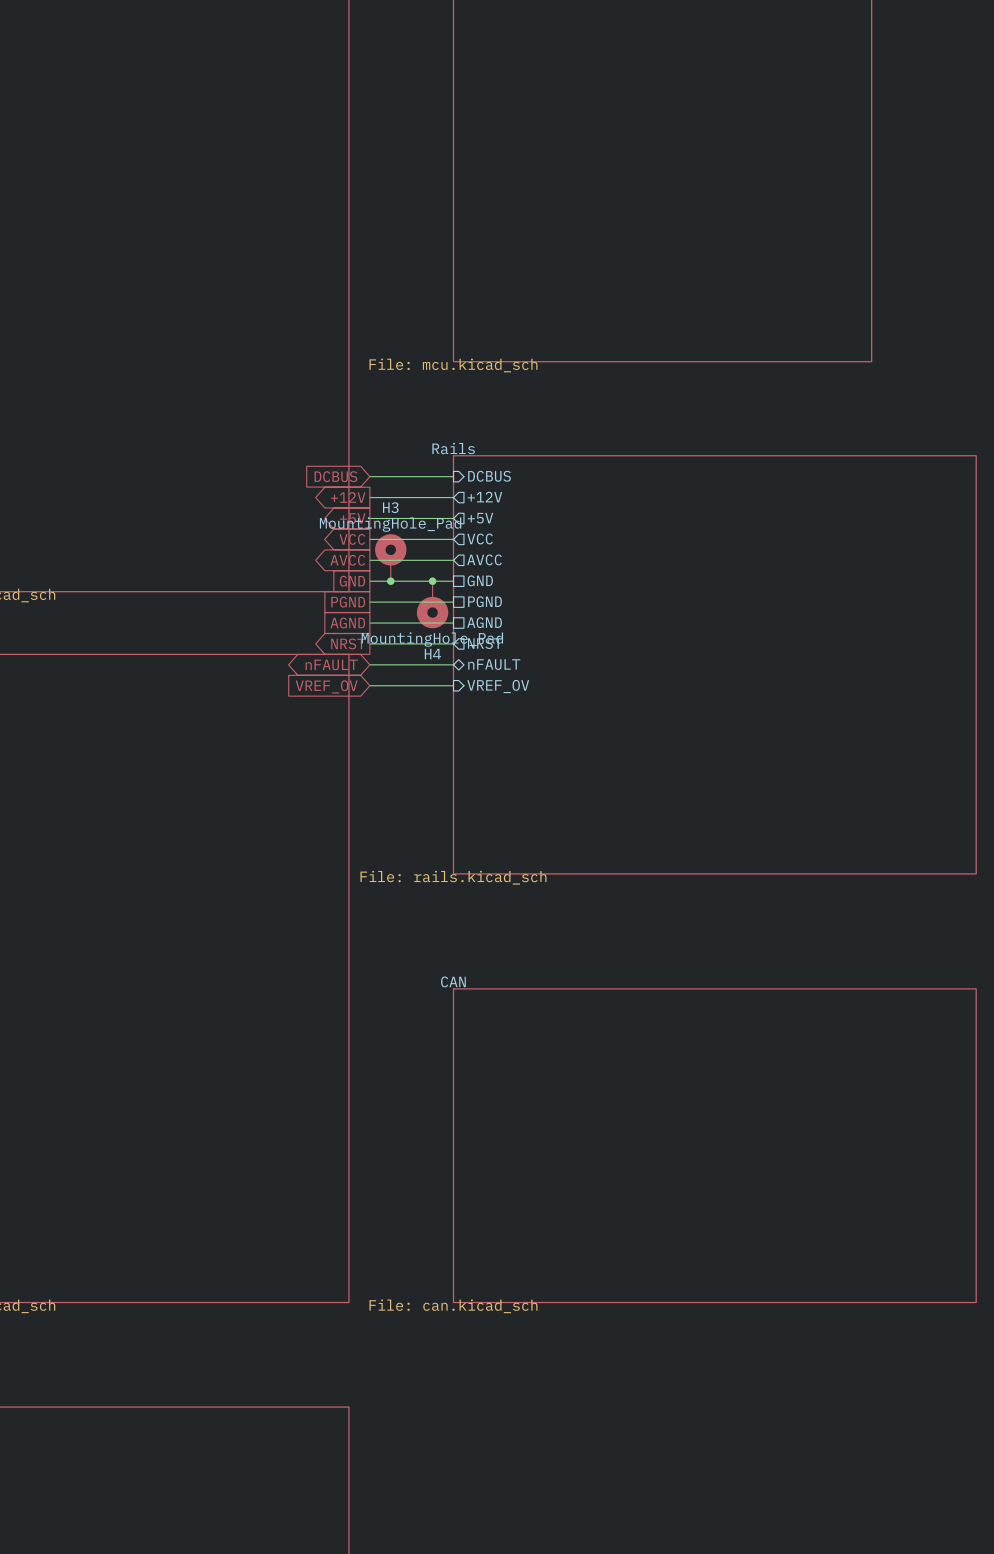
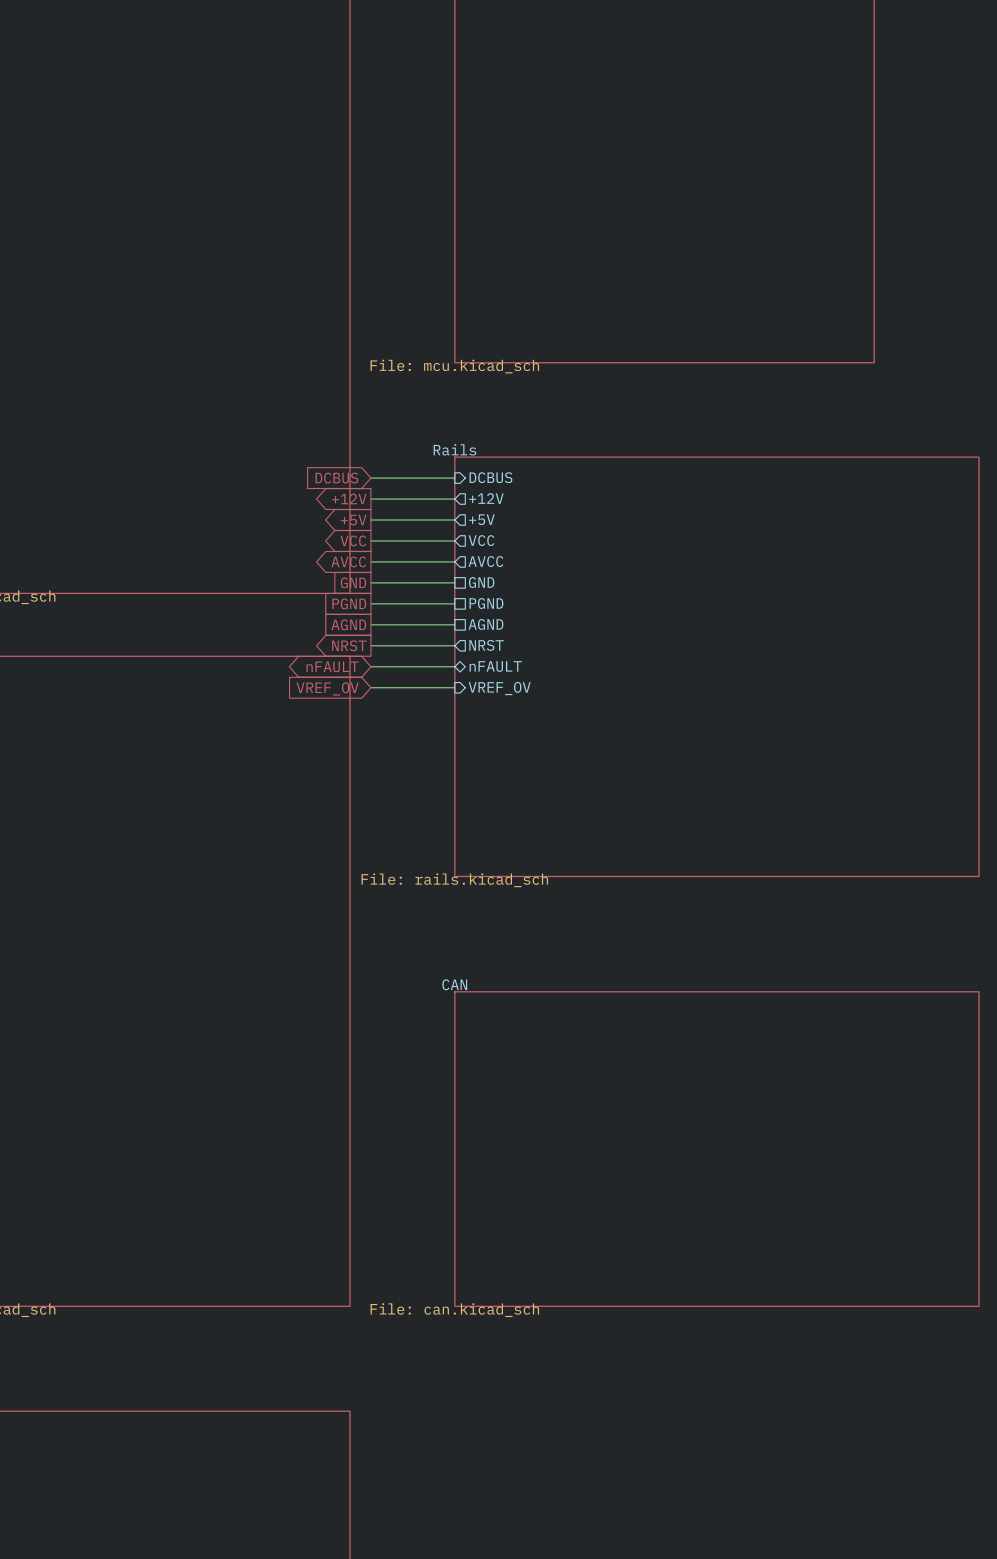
H3: MountingHole_Pad (390, 557) -> none
junction: (390, 581) -> none
junction: (432, 581) -> none
H4: MountingHole_Pad (432, 604) -> none

